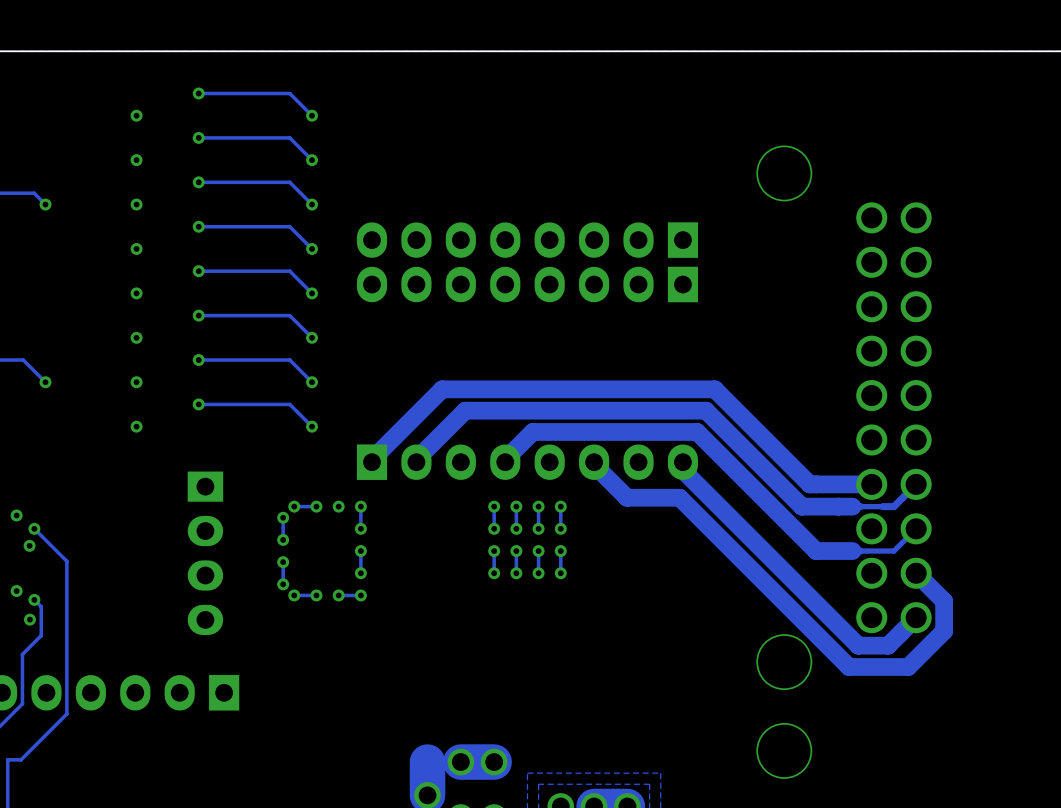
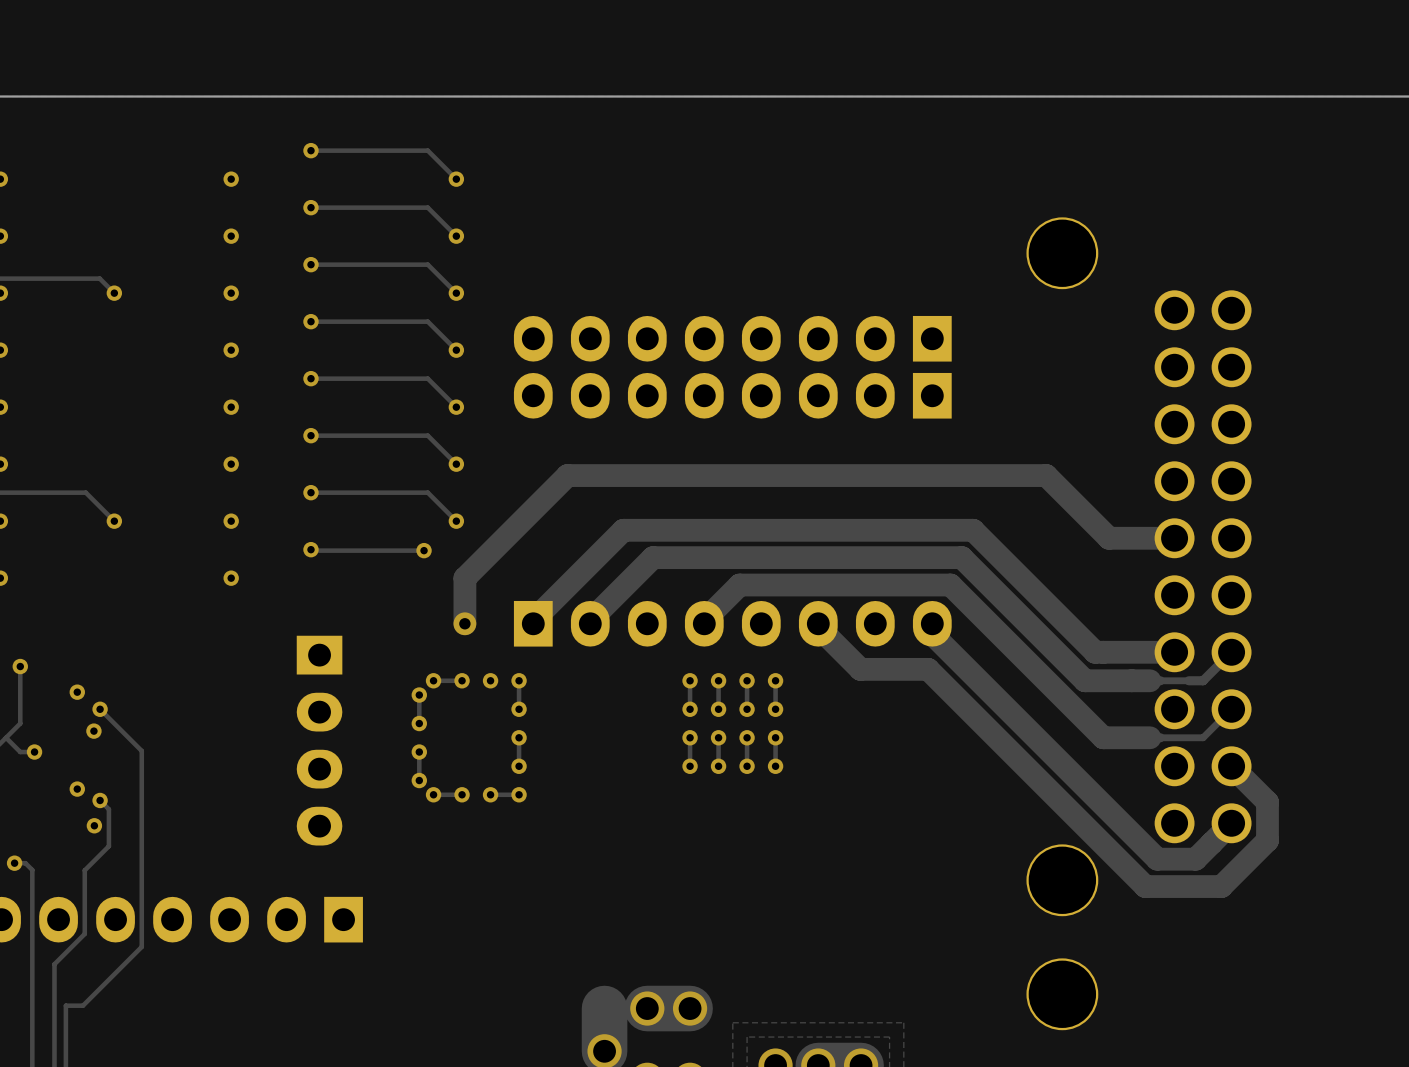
track: none -> (1174, 538) (1109, 538) (1046, 475) (567, 475) (464, 578) (464, 623)
track: (198, 404) (289, 404) (312, 426) -> (311, 549) (424, 550)
via position: (312, 426) -> (424, 550)
via: none -> (464, 623)

